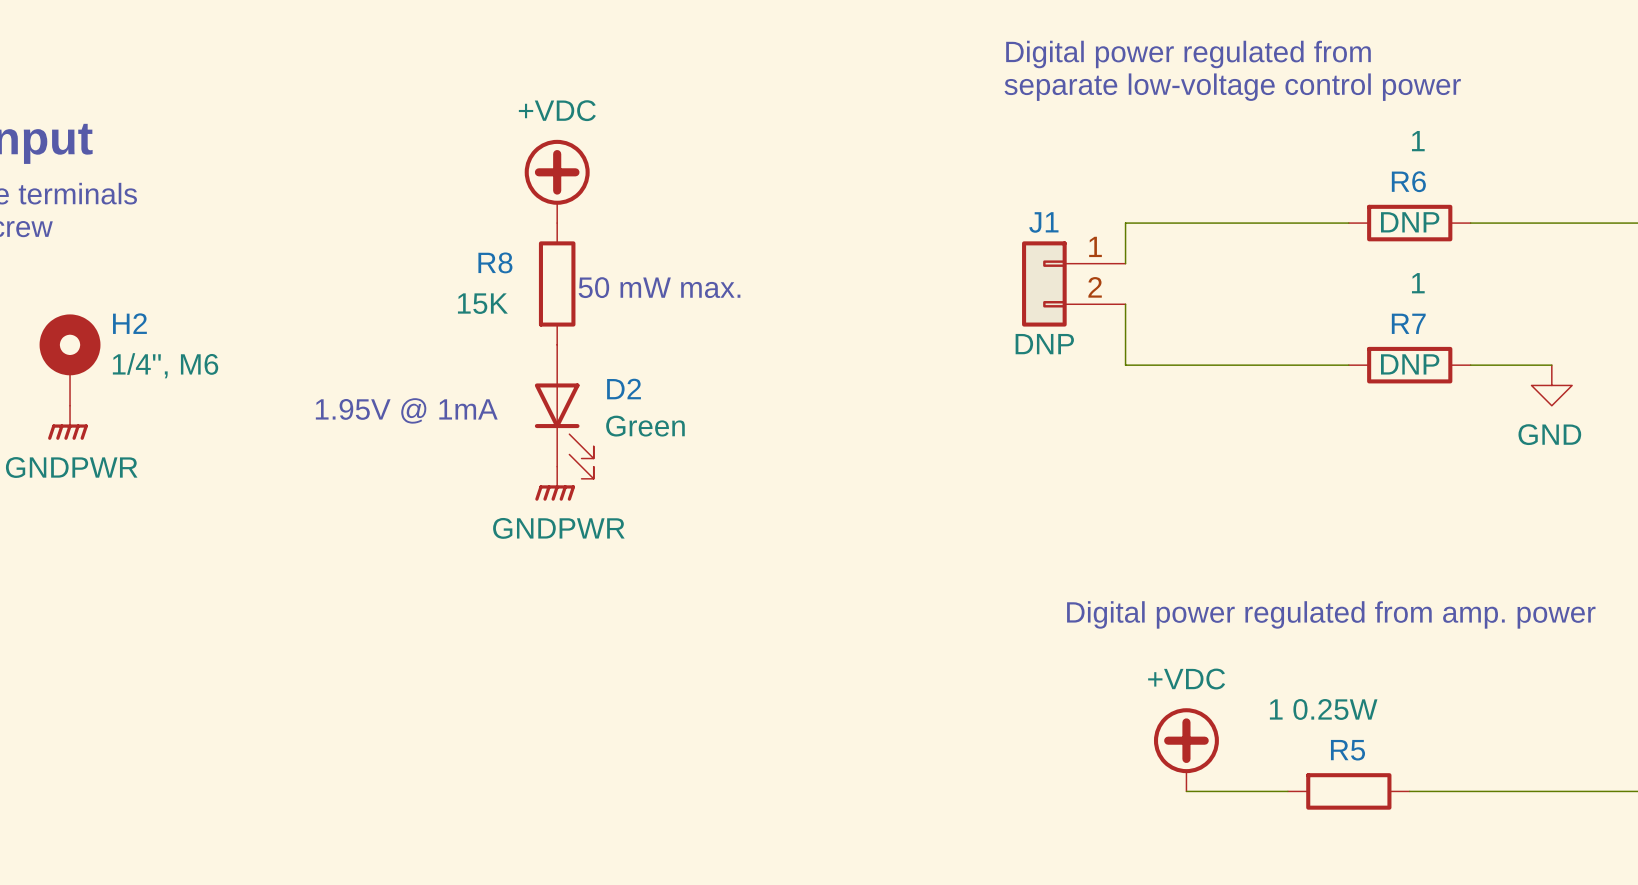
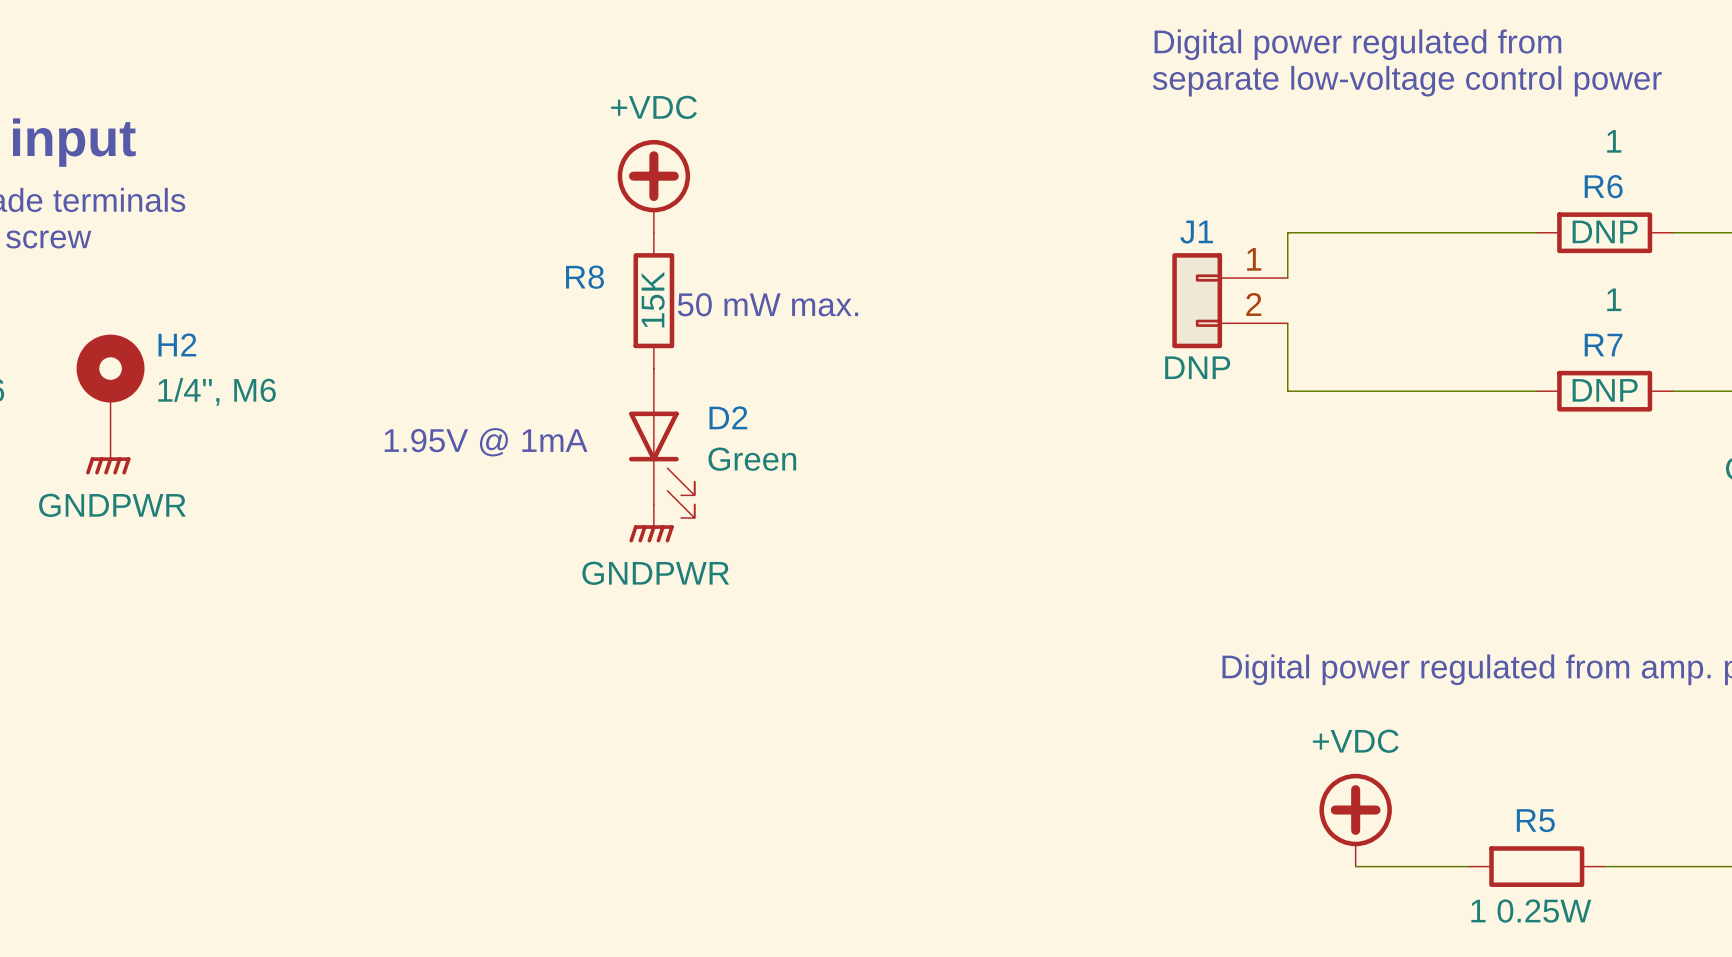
R8 value rotation: 0° (482, 303) -> 90° counterclockwise (653, 299)
R8 value position: 15K (482, 303) -> 15K (653, 299)
R5 value position: 1 0.25W (1323, 709) -> 1 0.25W (1531, 911)

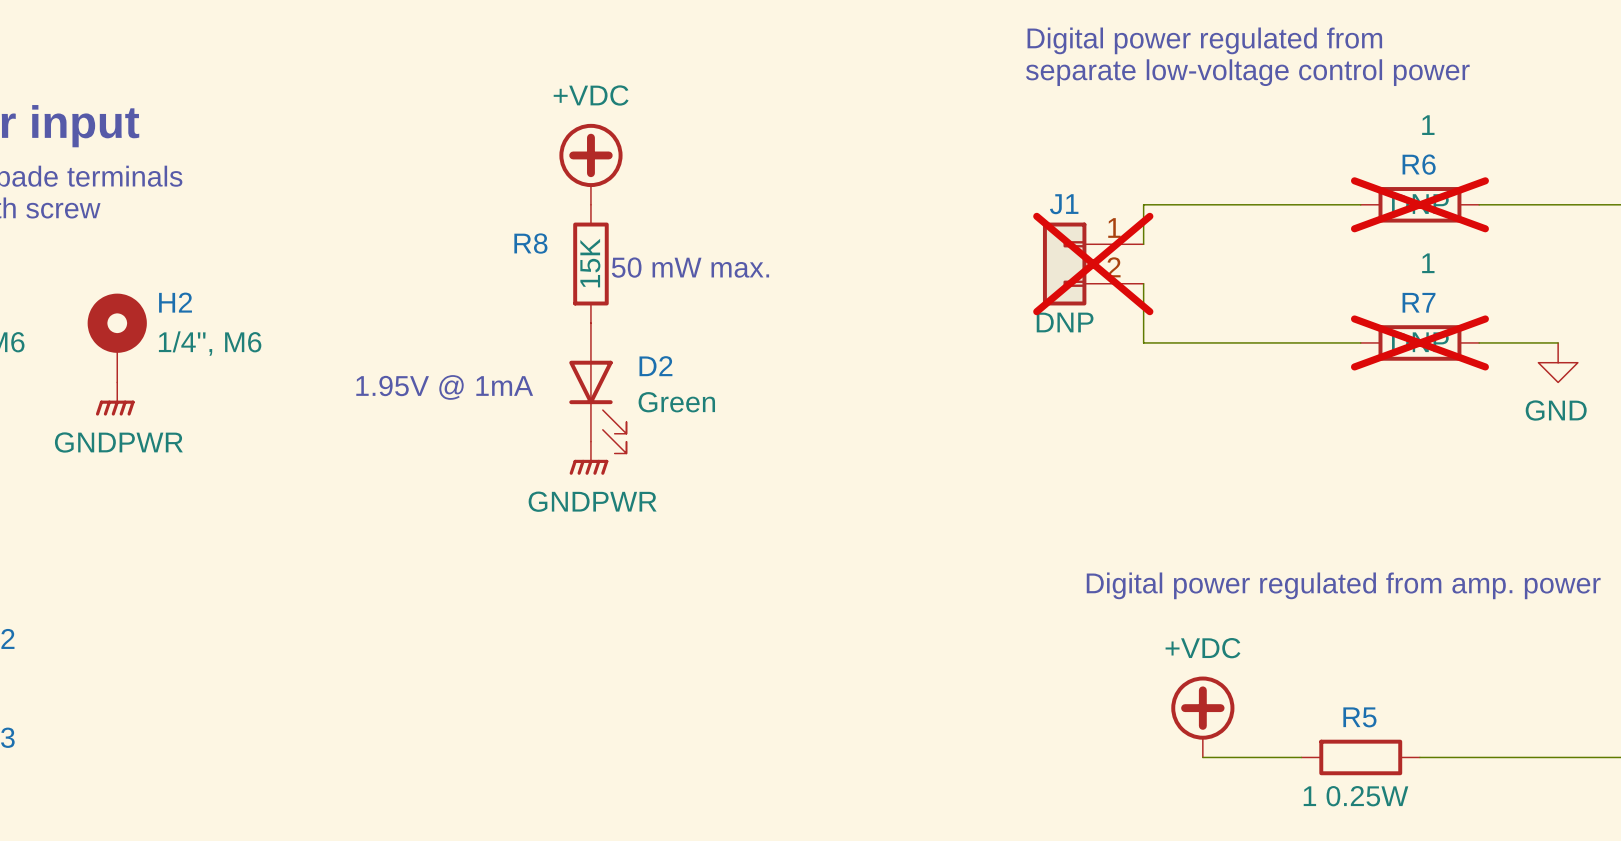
R6 do-not-place cross: none -> (1419, 204)
J1 do-not-place cross: none -> (1093, 264)
R7 do-not-place cross: none -> (1419, 342)

